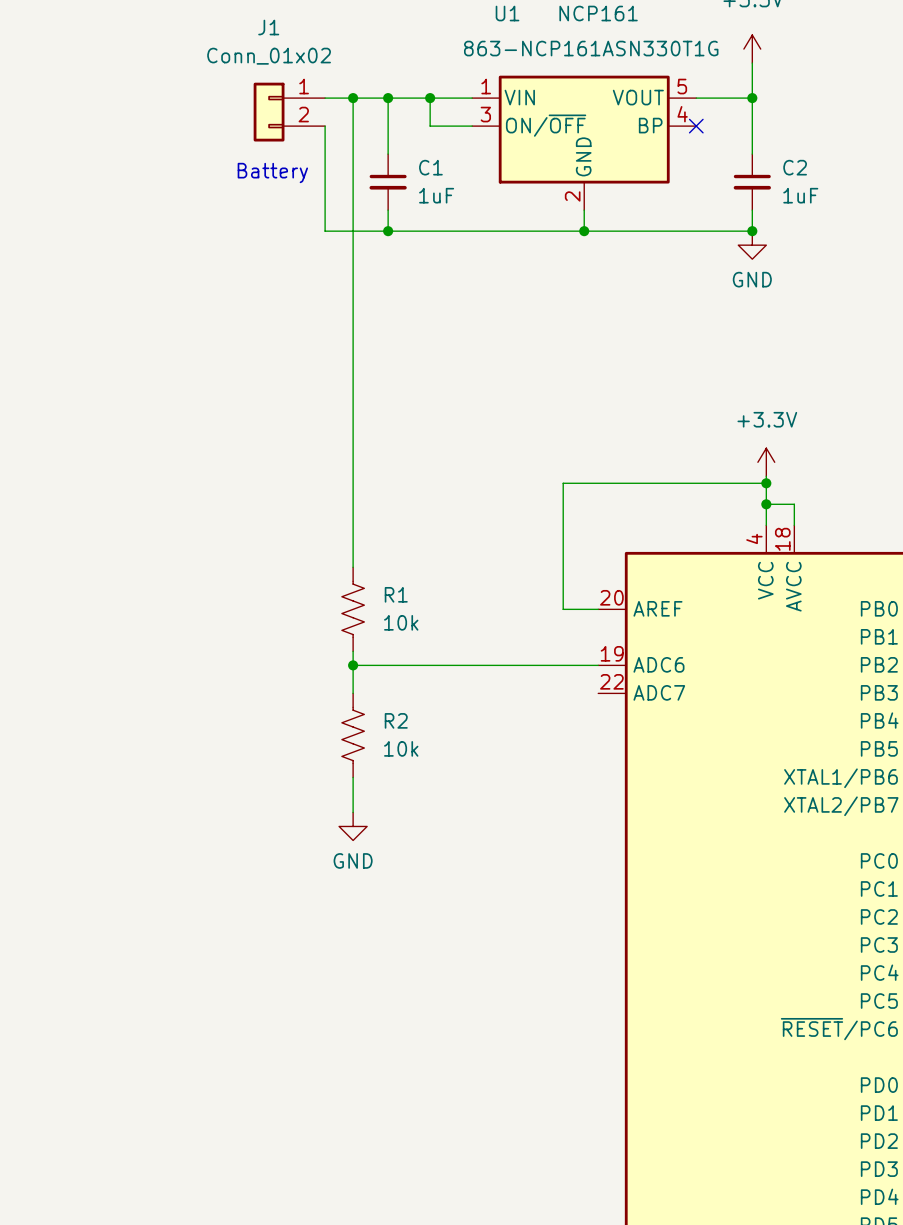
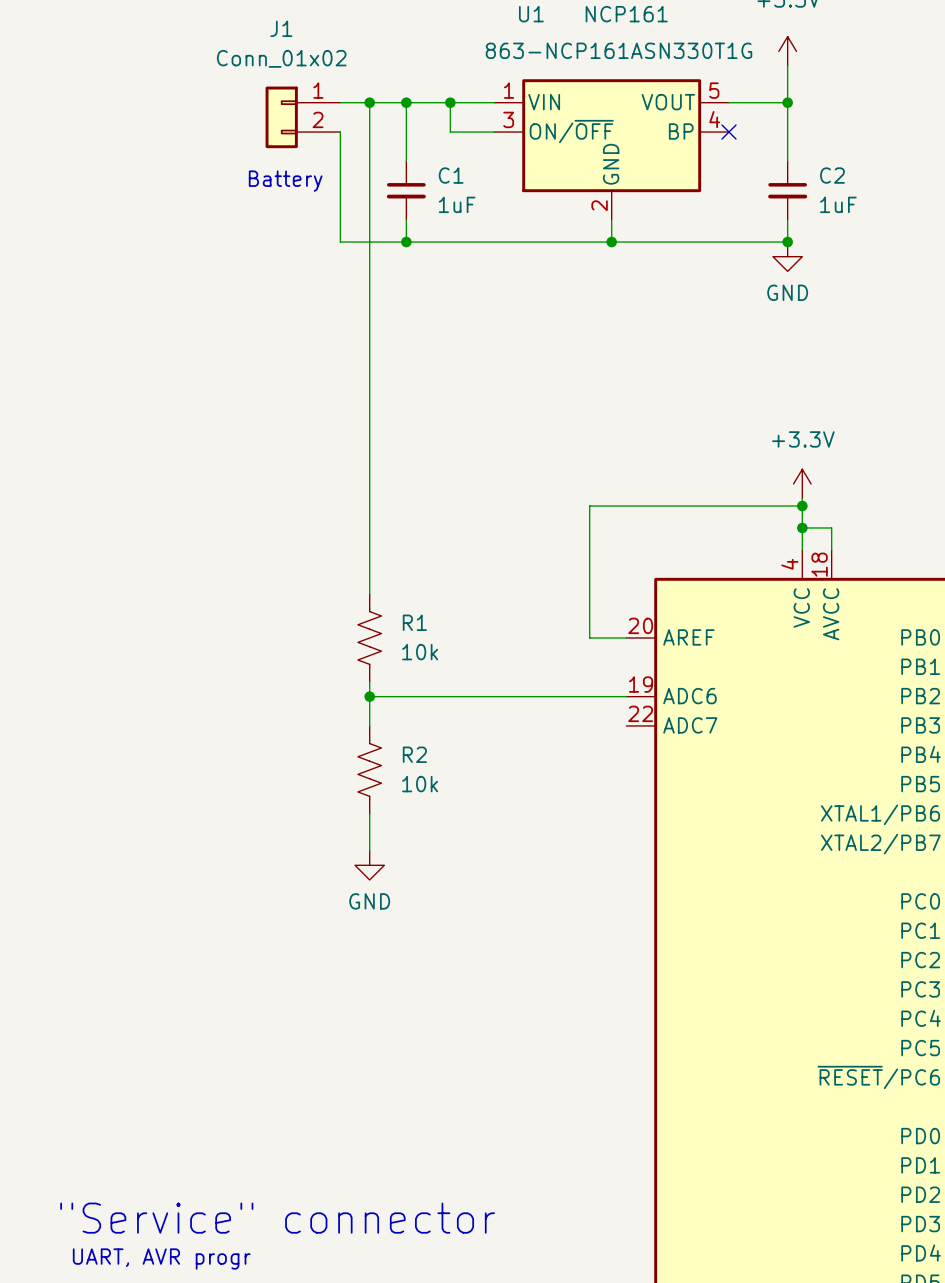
text: none -> "Service" connector (277, 1218)
text: none -> UART, AVR progr (161, 1259)

